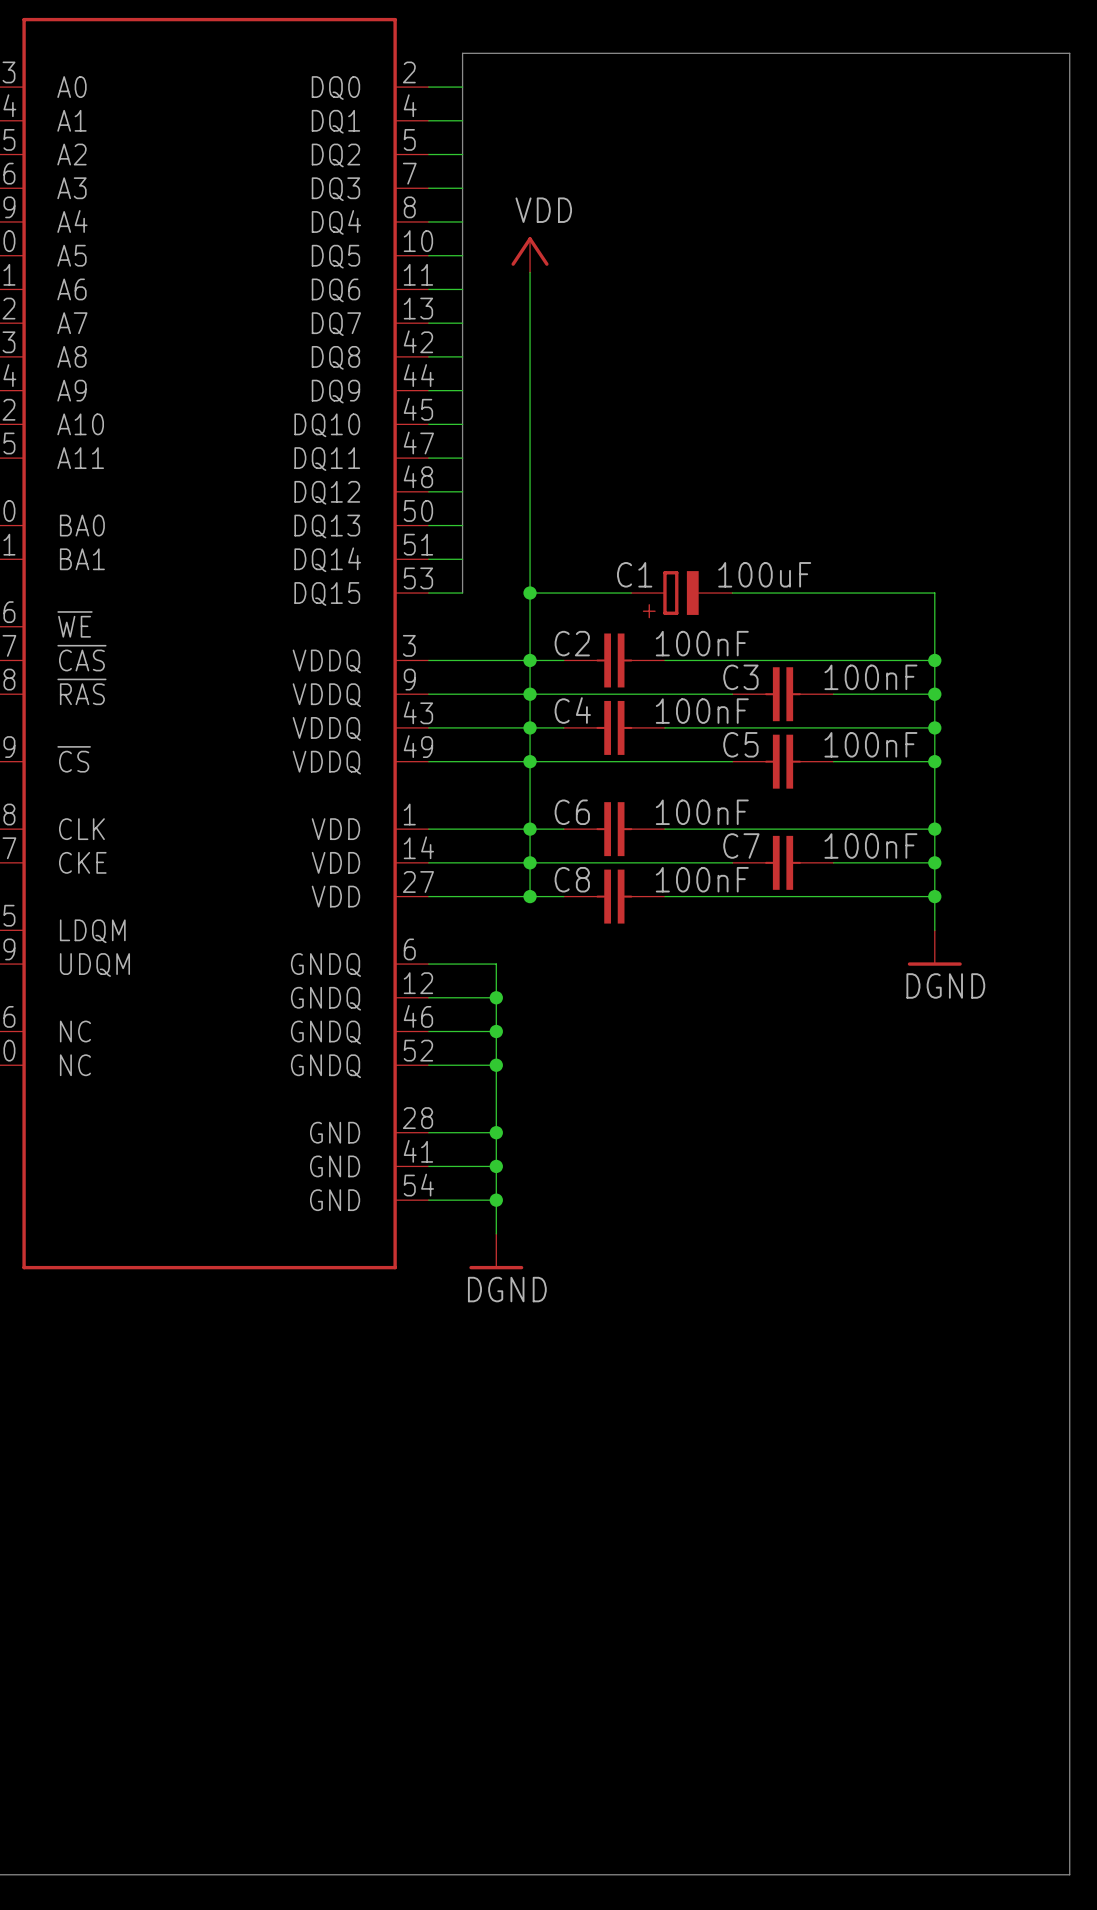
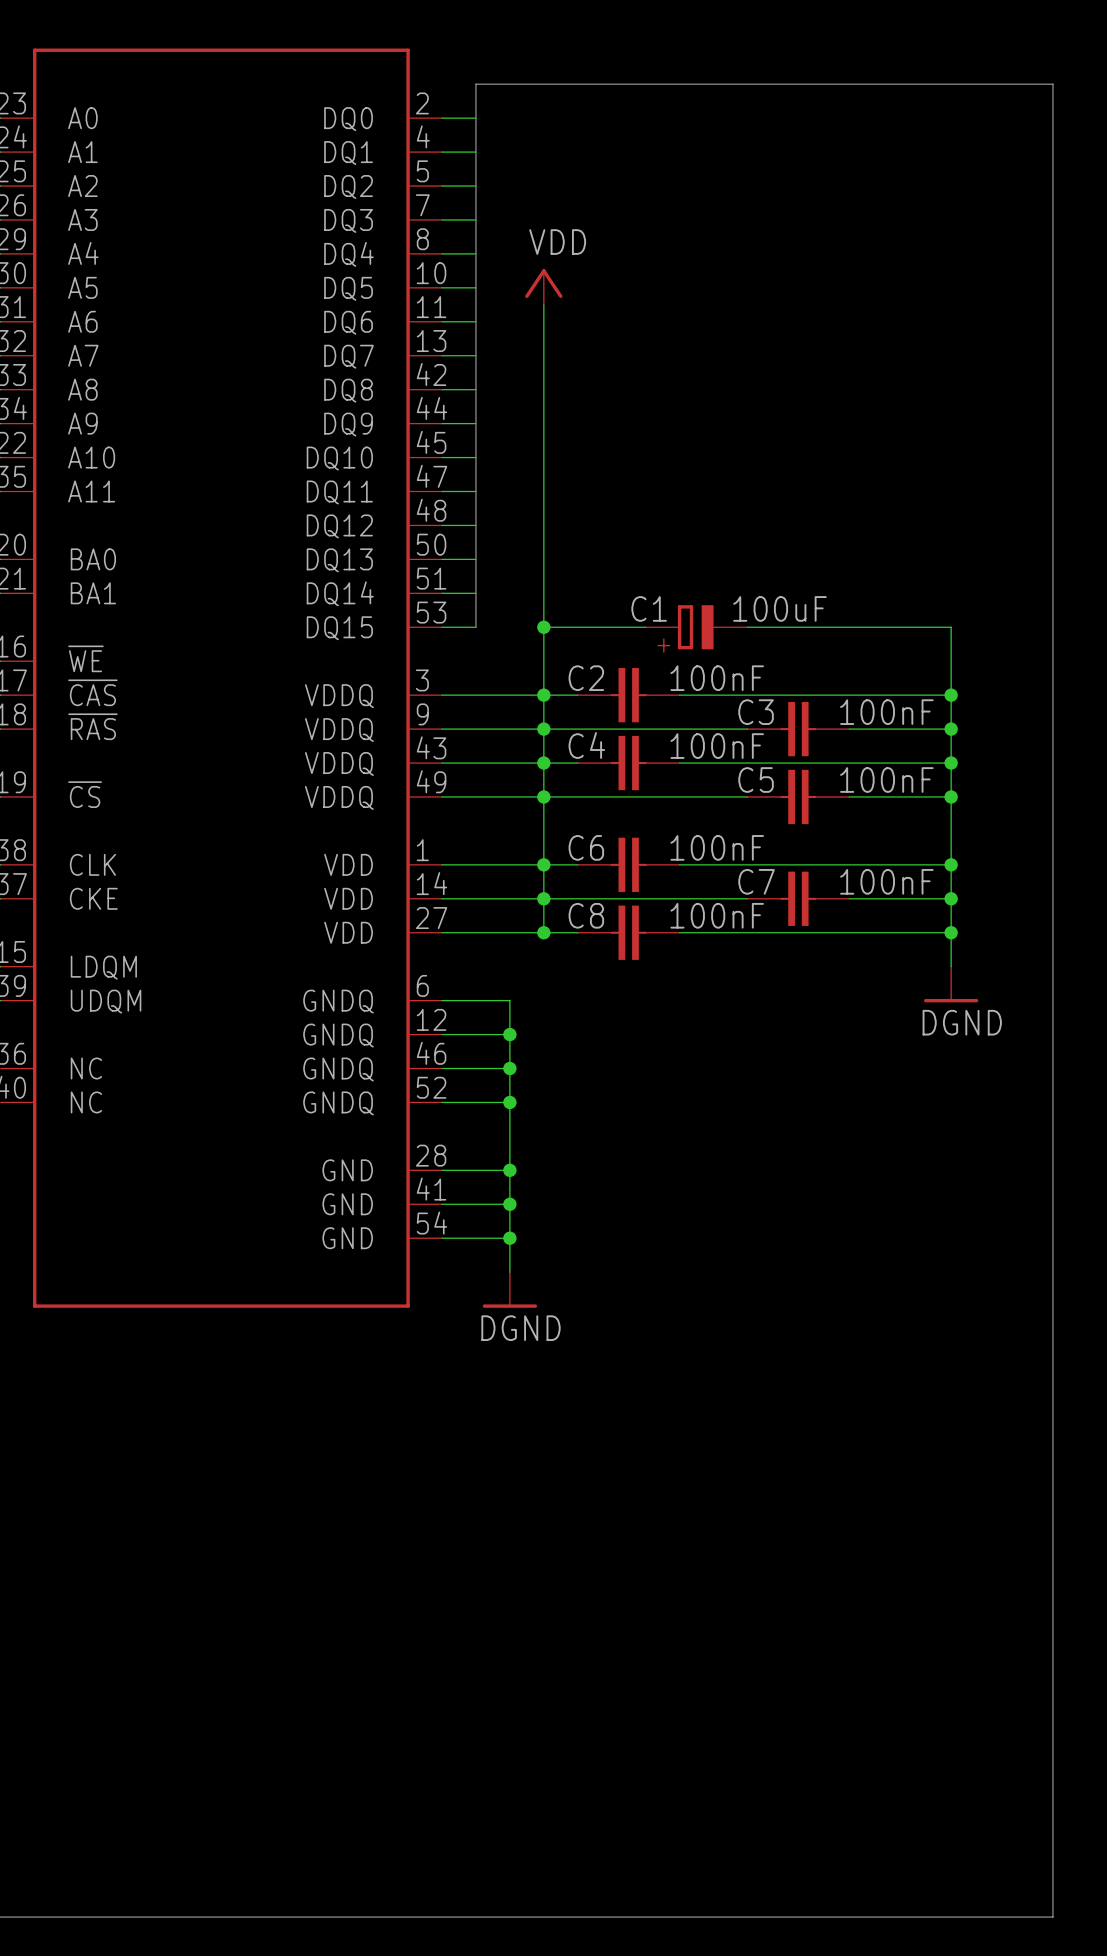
bus: (1035, 53) (1069, 53) (1069, 1874) (1035, 1874) -> (1052, 84) (1052, 1917)

